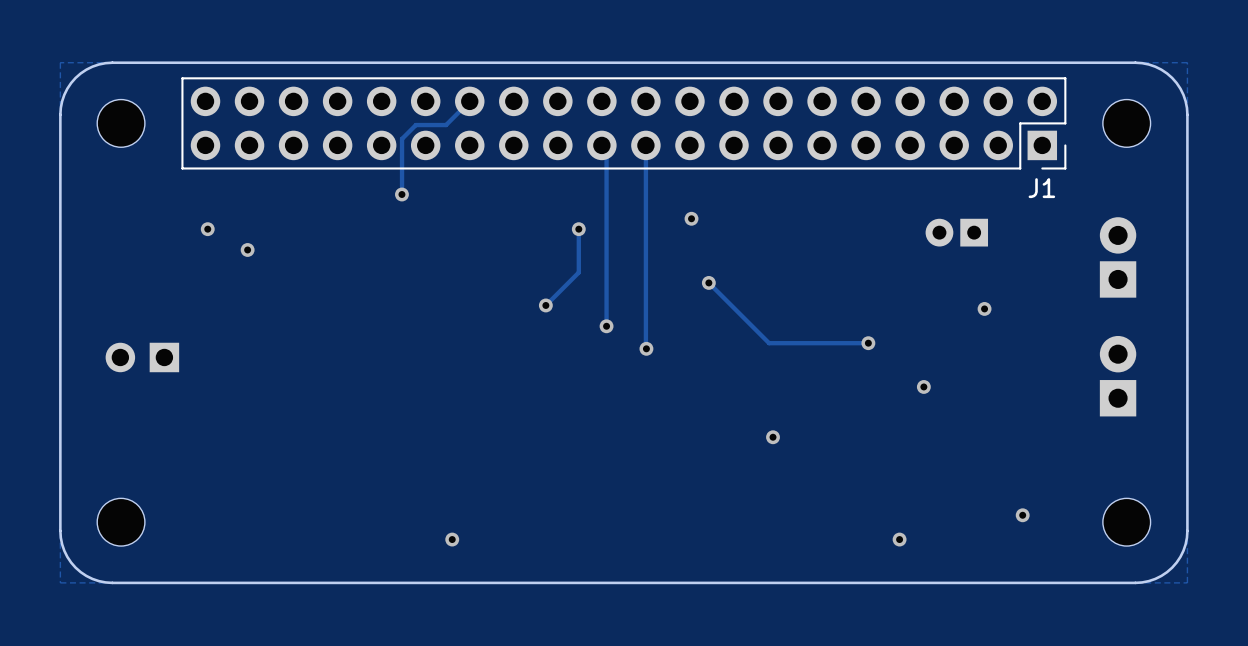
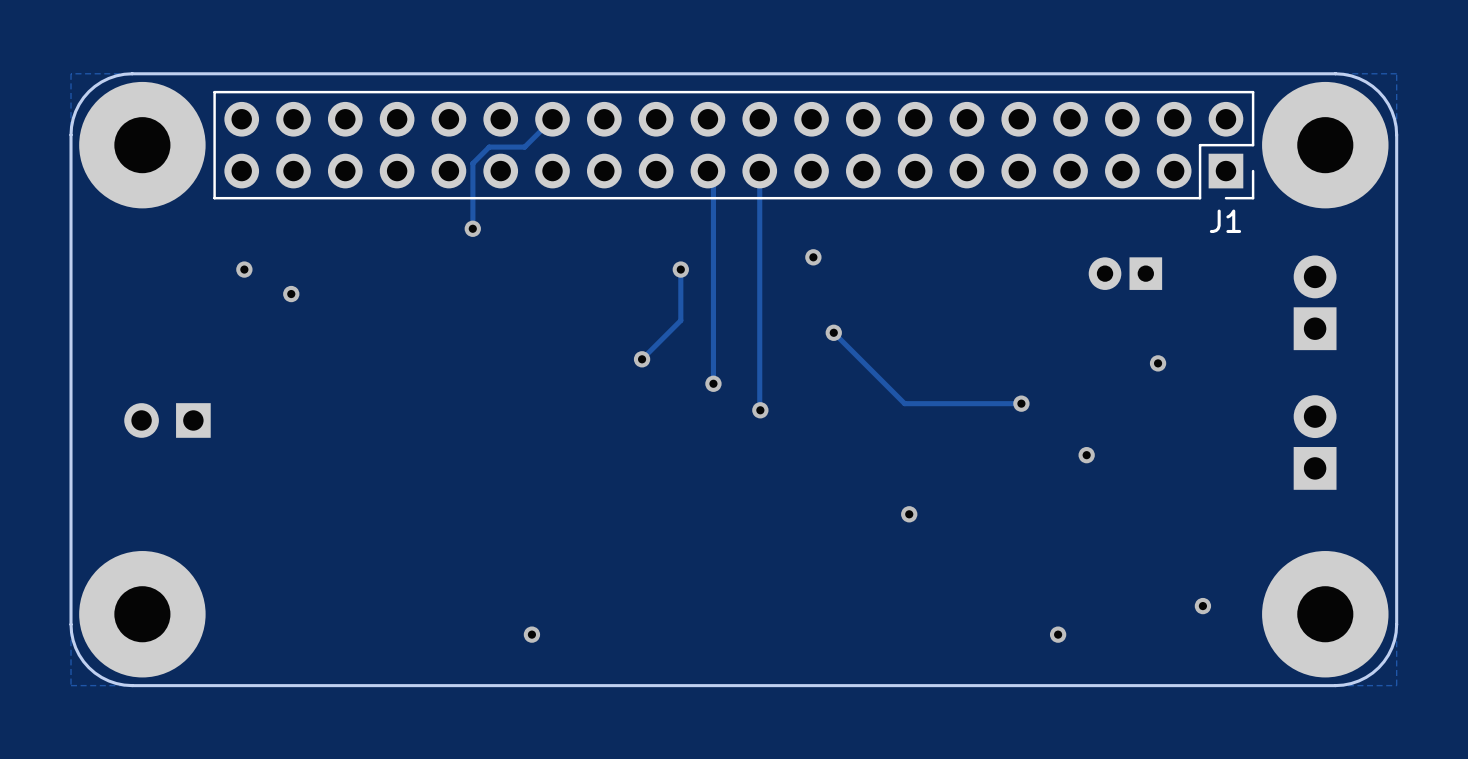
part footprint: [97, 99, 145, 148] -> [79, 81, 206, 209]
part footprint: [1102, 99, 1151, 148] -> [1262, 81, 1389, 209]
part footprint: [97, 498, 145, 547] -> [79, 551, 206, 678]
part footprint: [1102, 498, 1151, 547] -> [1262, 551, 1389, 678]

